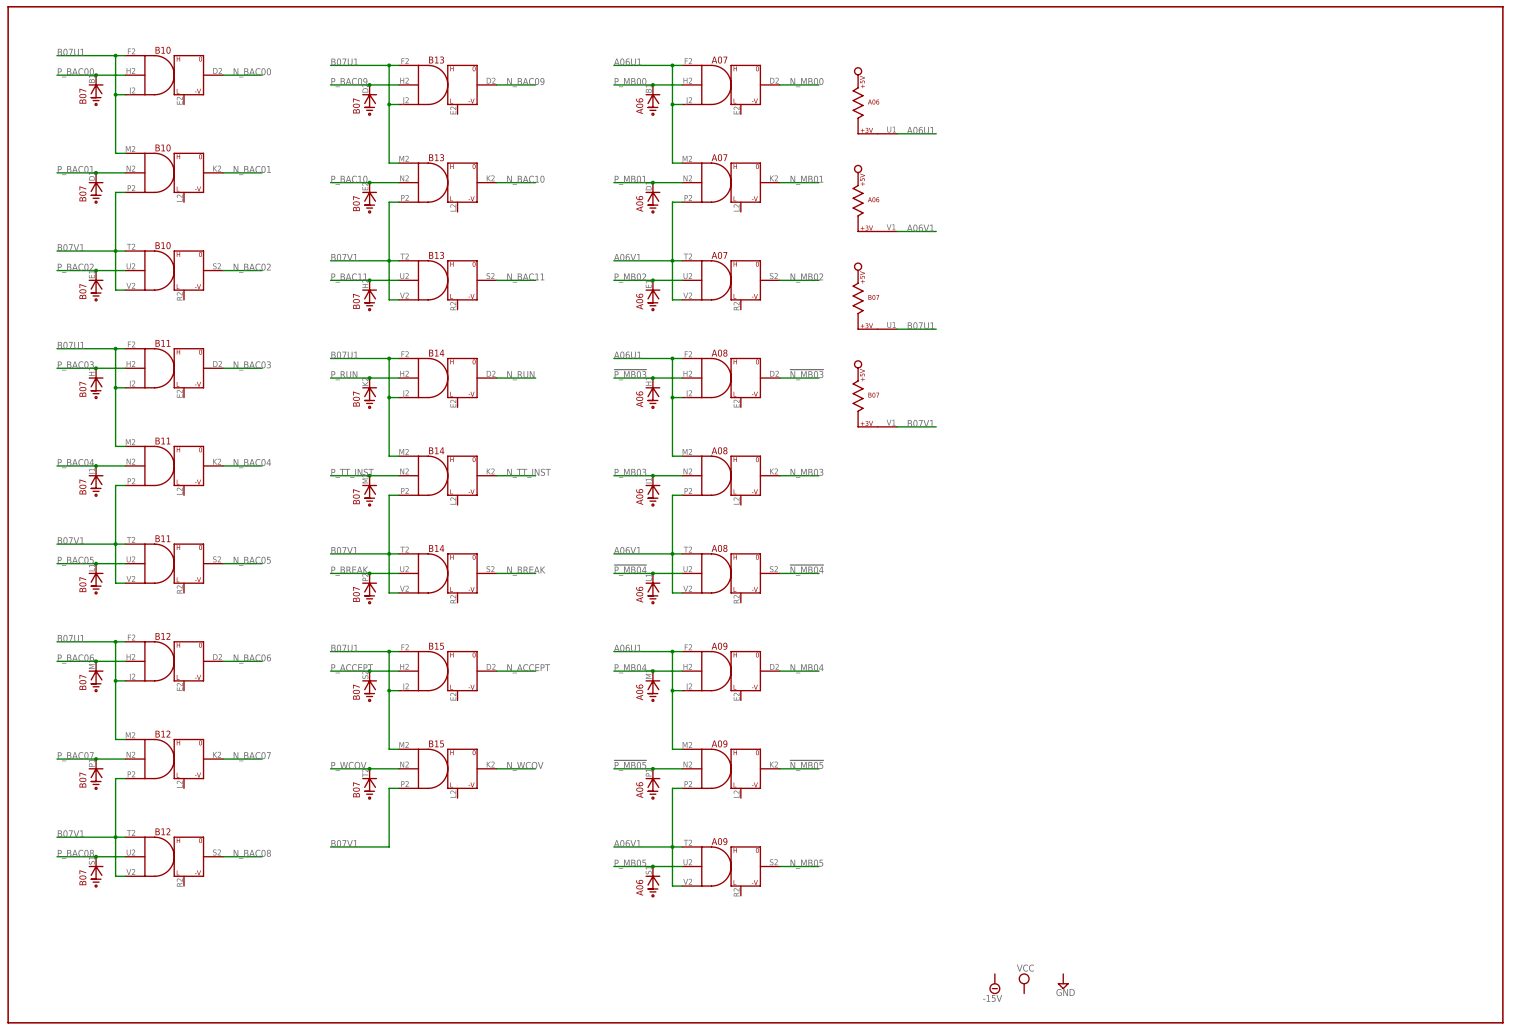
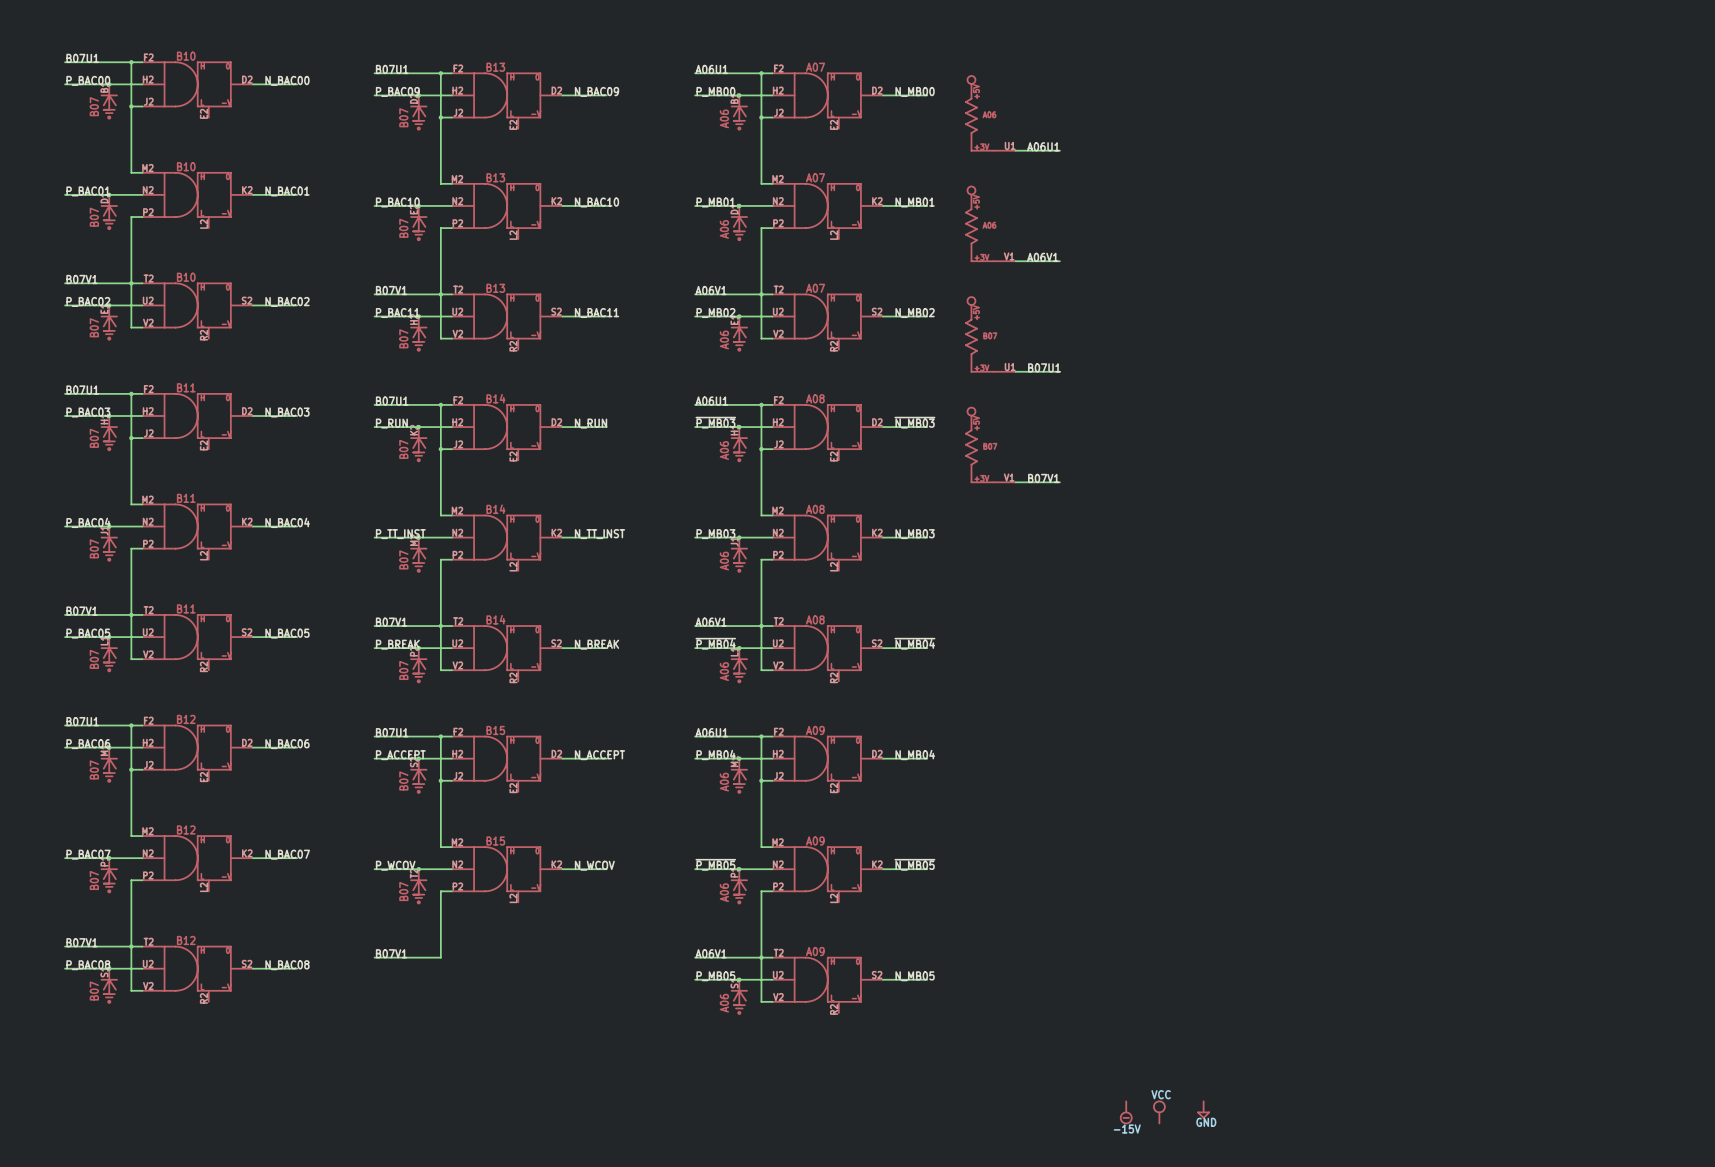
part: (755, 514) -> none

